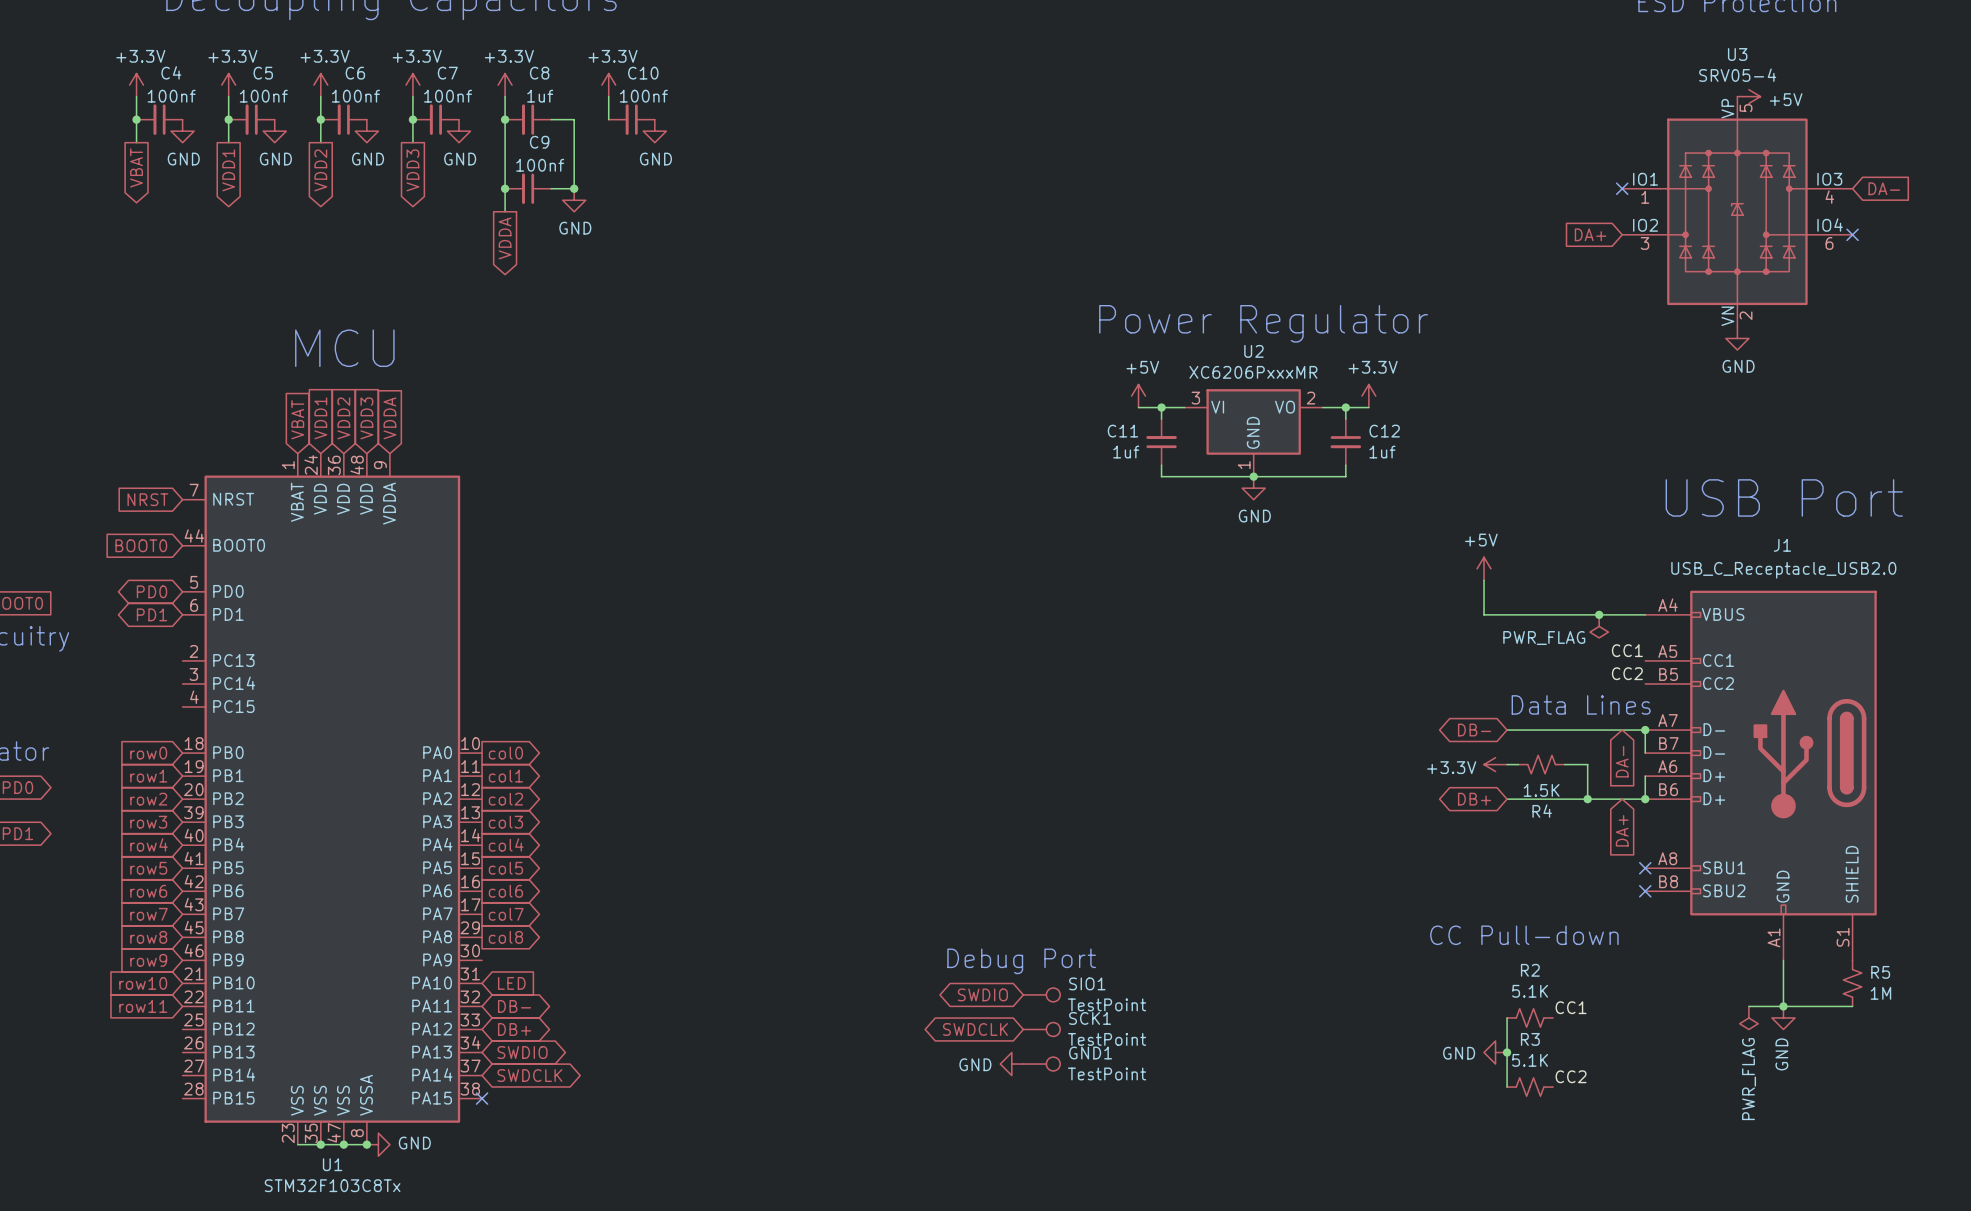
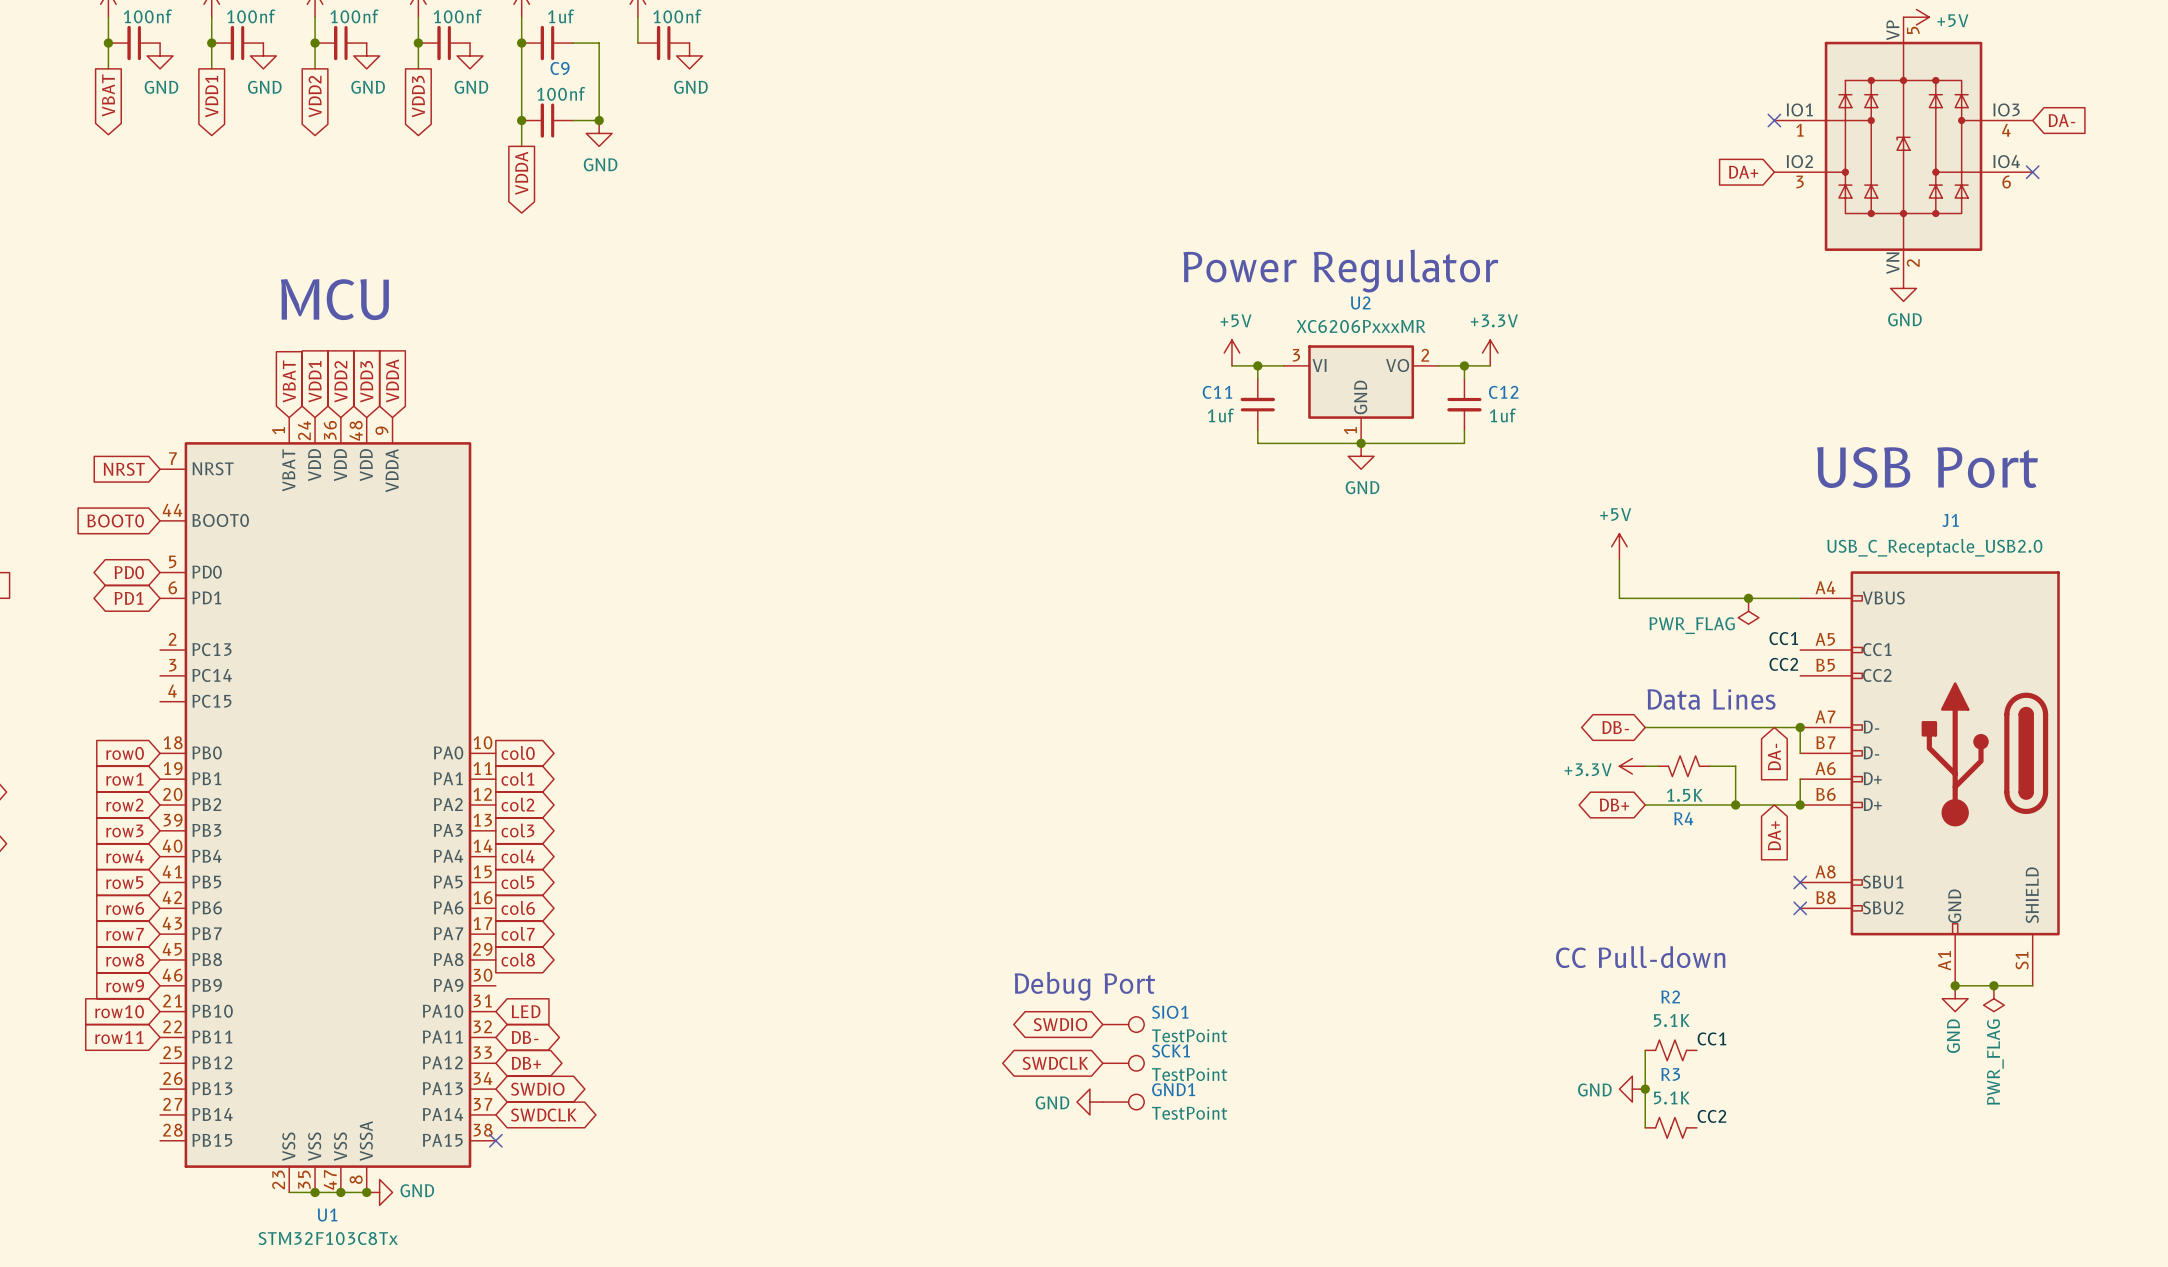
wire: (1783, 960) (1783, 1006) -> (1955, 985) (2032, 985)
junction: none -> (1955, 985)
junction: none -> (1993, 985)
R5: 1M (1852, 983) -> none
wire: (1748, 1006) (1852, 1006) -> none
junction: (1783, 1006) -> none
power symbol position: PWR_FLAG (1748, 1017) -> PWR_FLAG (1993, 998)
power symbol position: GND (1783, 1017) -> GND (1955, 998)

